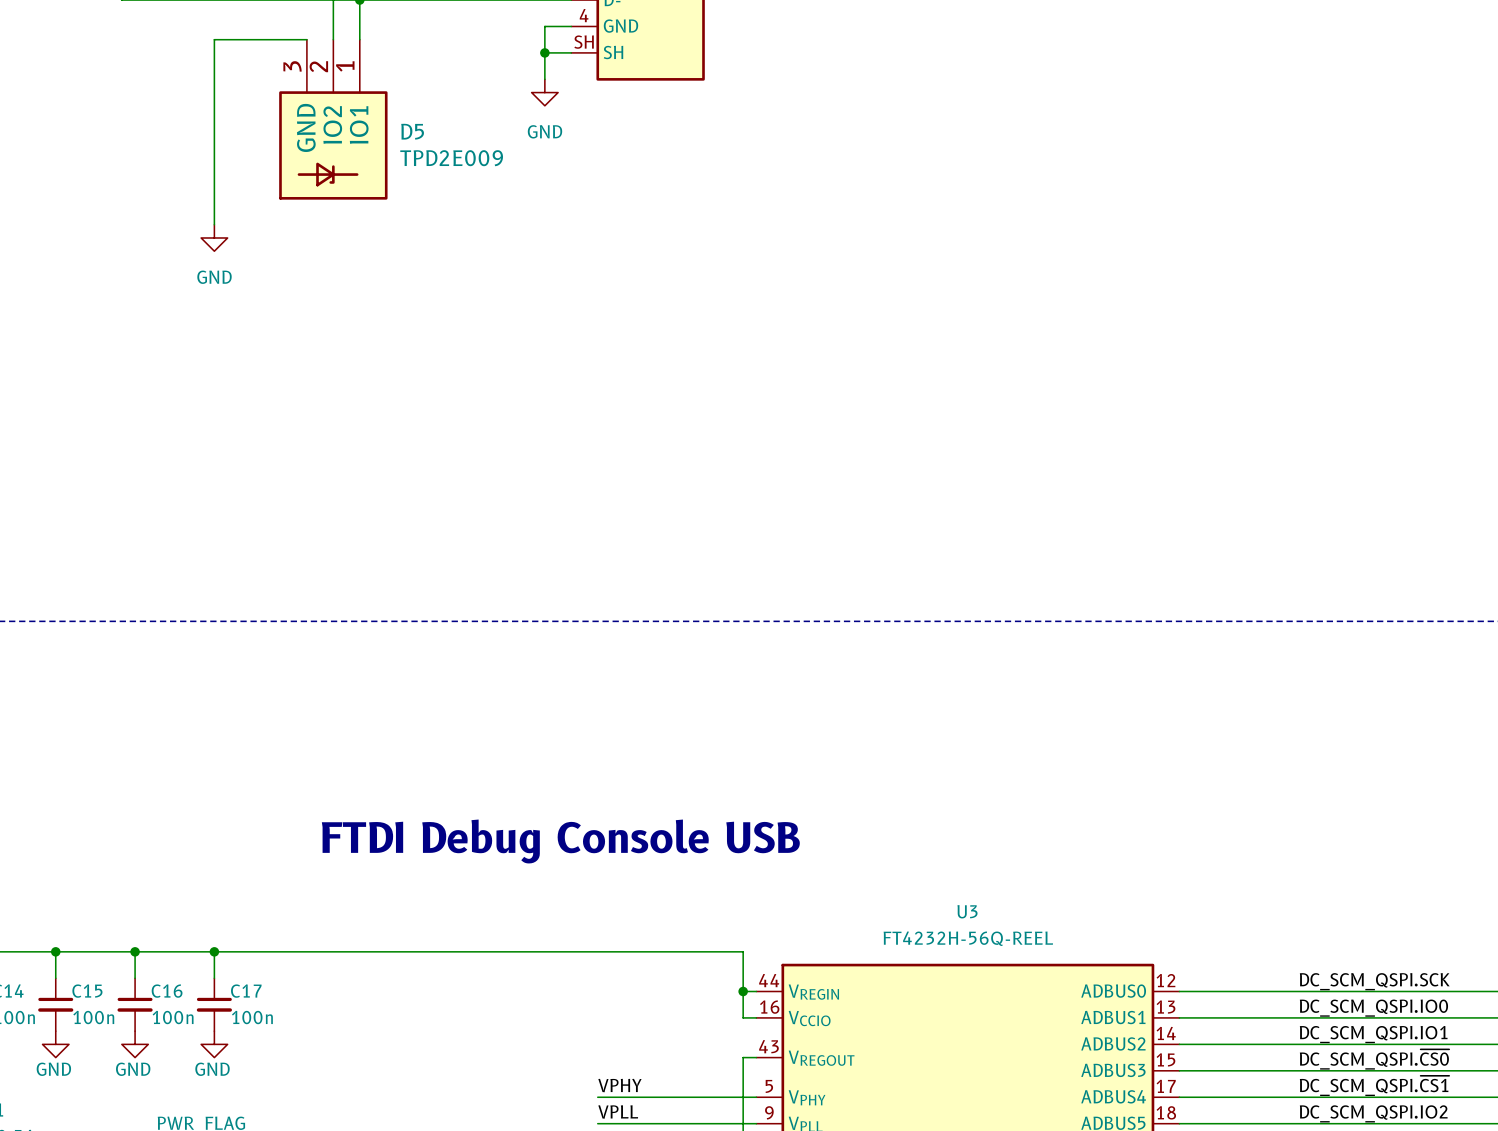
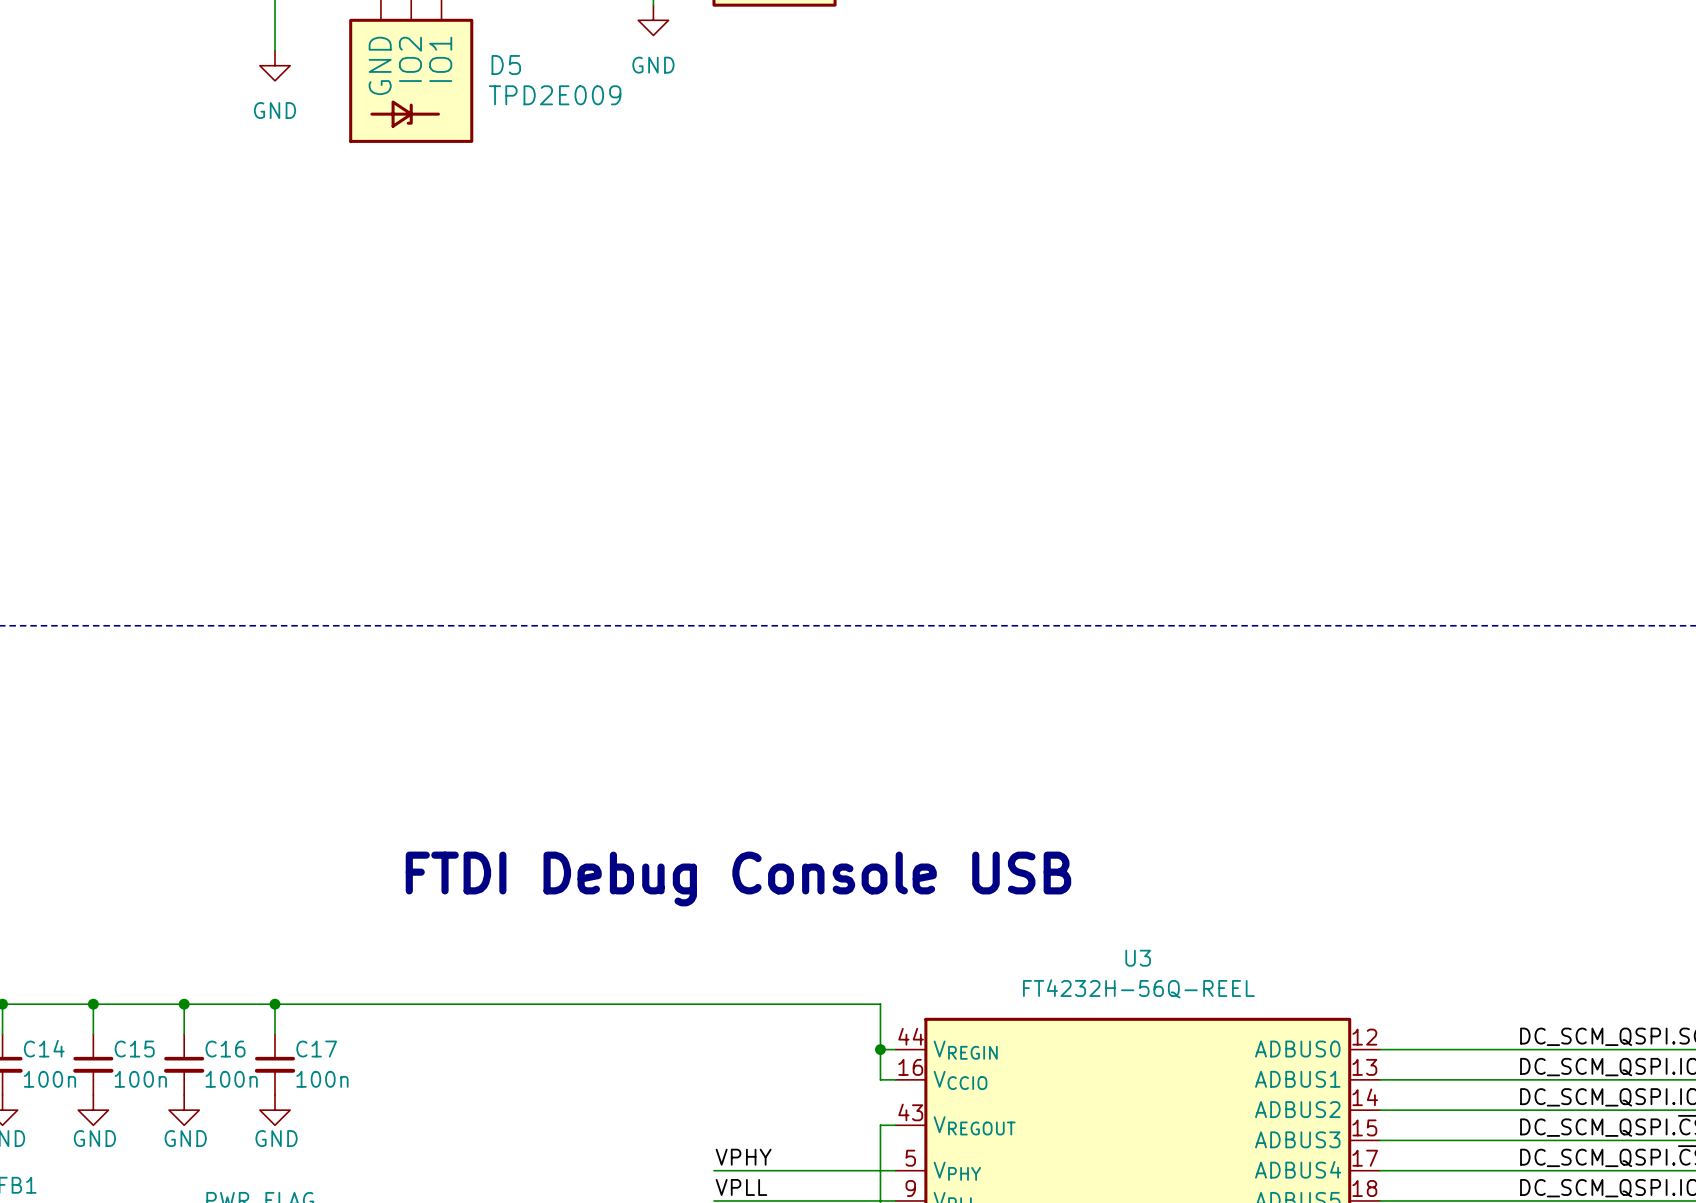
wire: (214, 119) (214, 224) -> none
power symbol position: GND (214, 237) -> GND (275, 65)

